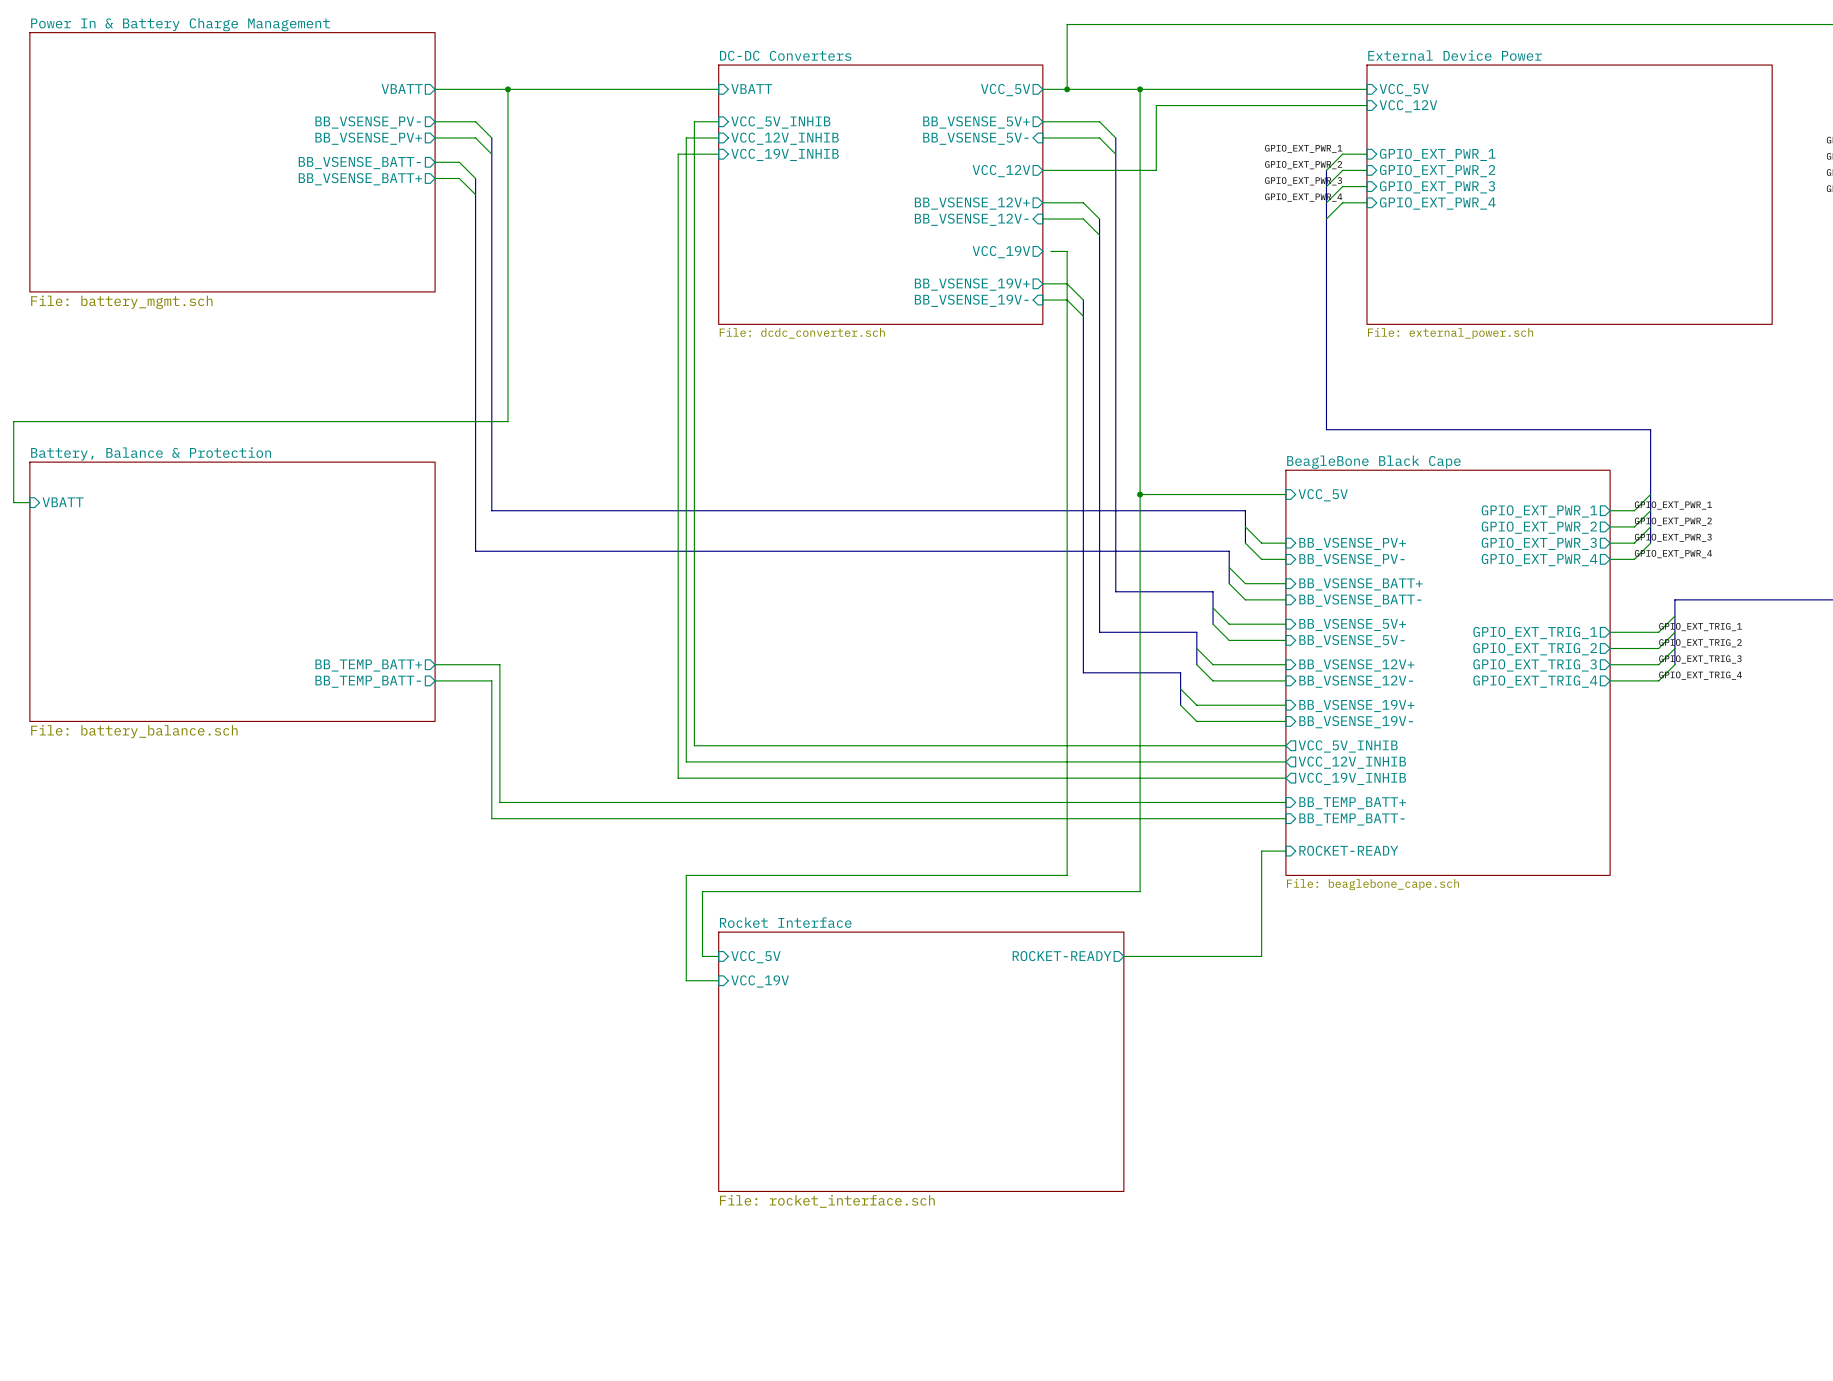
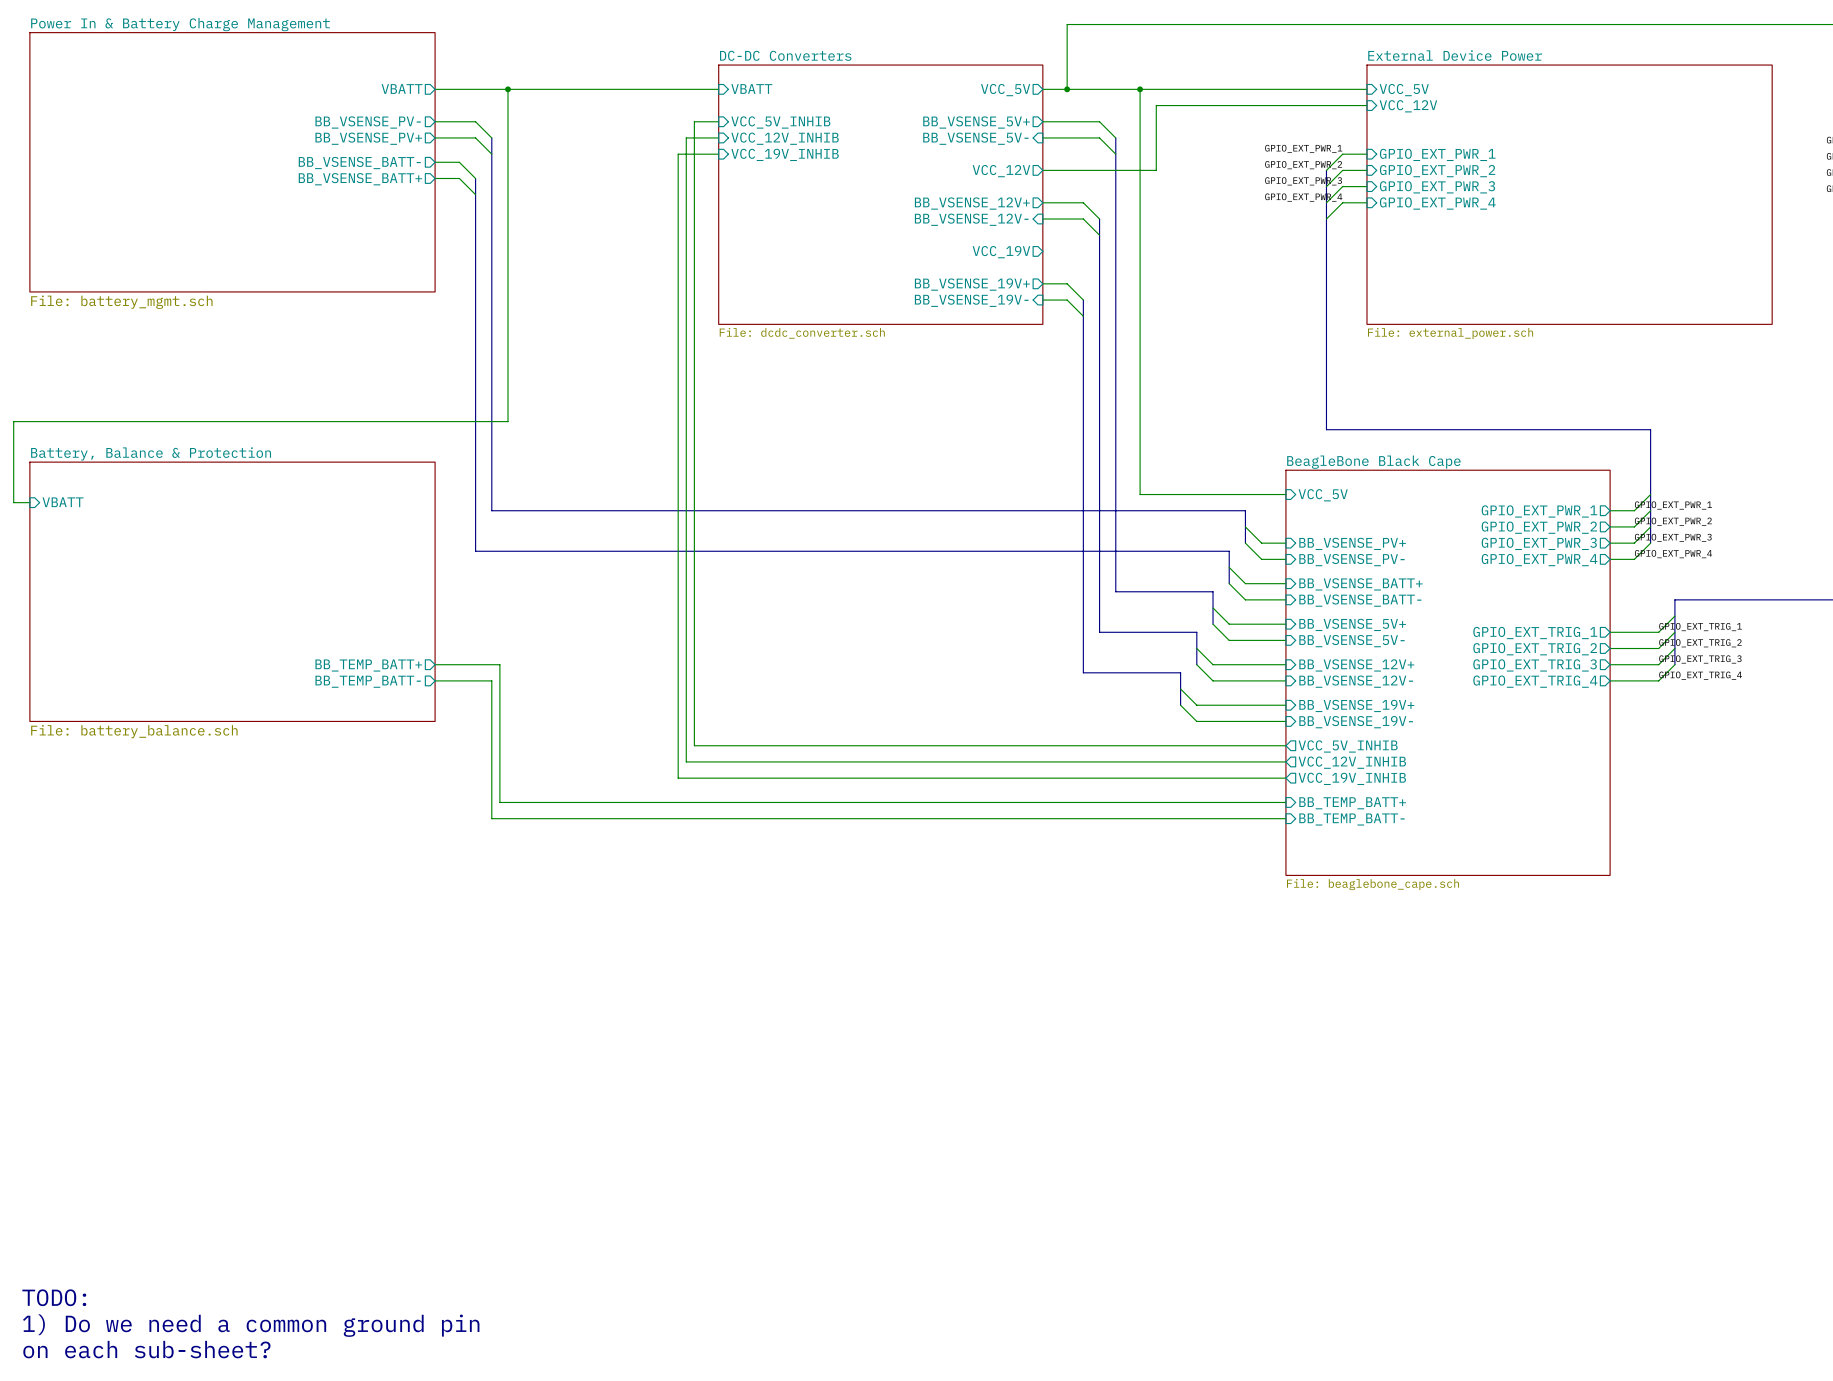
wire: (1050, 251) (1067, 251) (1067, 875) (686, 875) (686, 980) (718, 980) -> none
wire: (1140, 494) (1140, 891) (702, 891) (702, 956) (718, 956) -> none
junction: (1140, 494) -> none
sheet pin: ROCKET-READY (1348, 850) -> none
wire: (1285, 851) (1261, 851) (1261, 956) (1123, 956) -> none
sheet pin: ROCKET-READY (1062, 956) -> none
sheet pin: VCC_5V (755, 957) -> none
sheet pin: VCC_19V (760, 981) -> none
sheet Rocket Interface: File: rocket_interface.sch (921, 1061) -> none
text: none -> TODO: (54, 1297)
text: none -> 1) Do we need a common ground pin (251, 1325)
text: none -> on each sub-sheet? (146, 1349)

